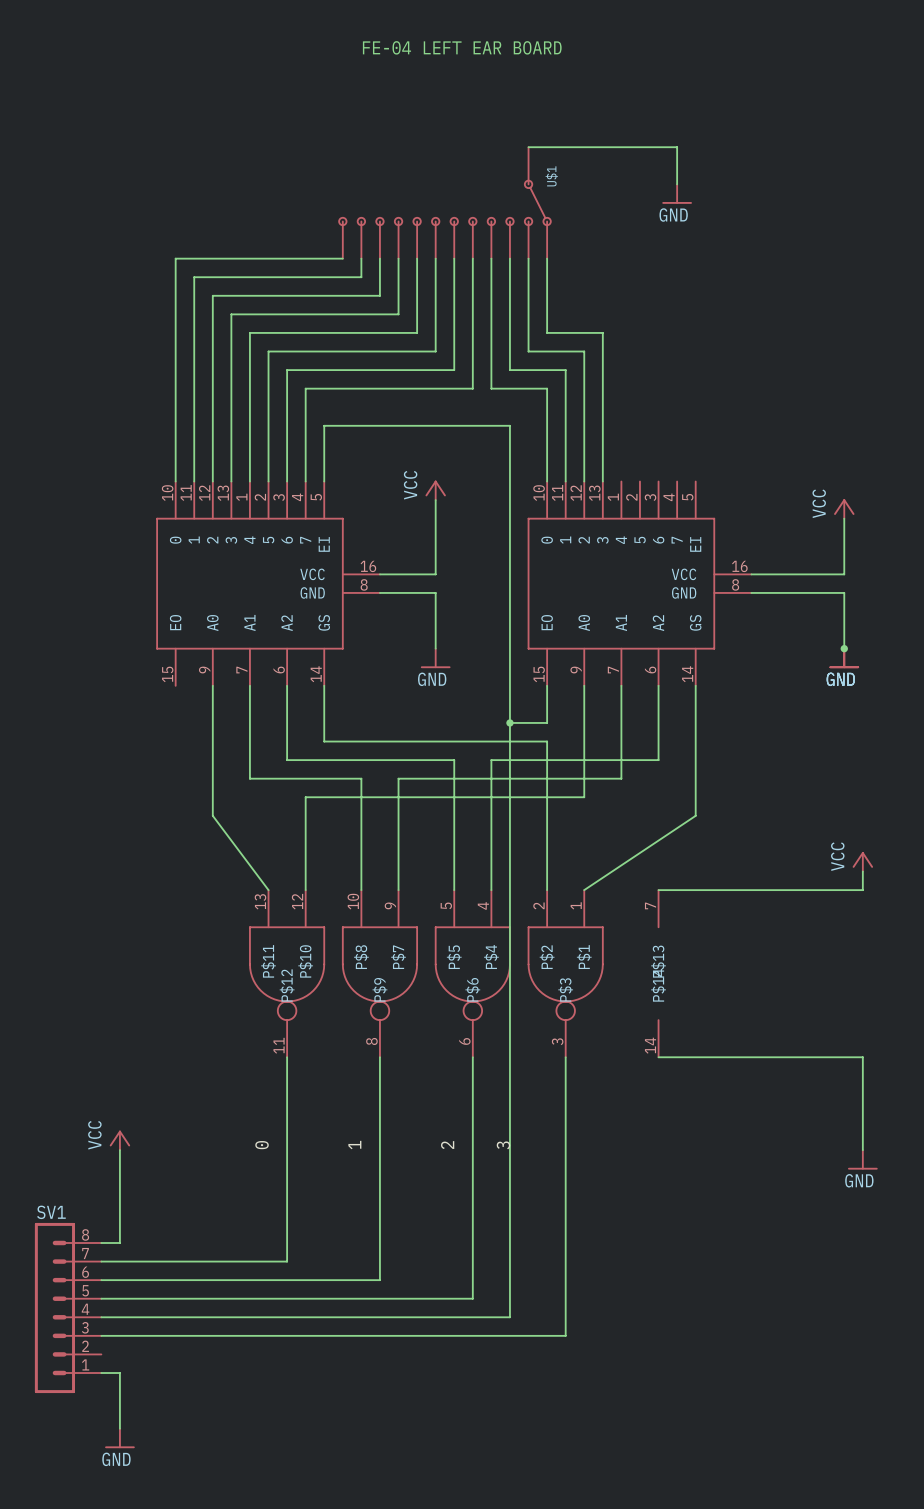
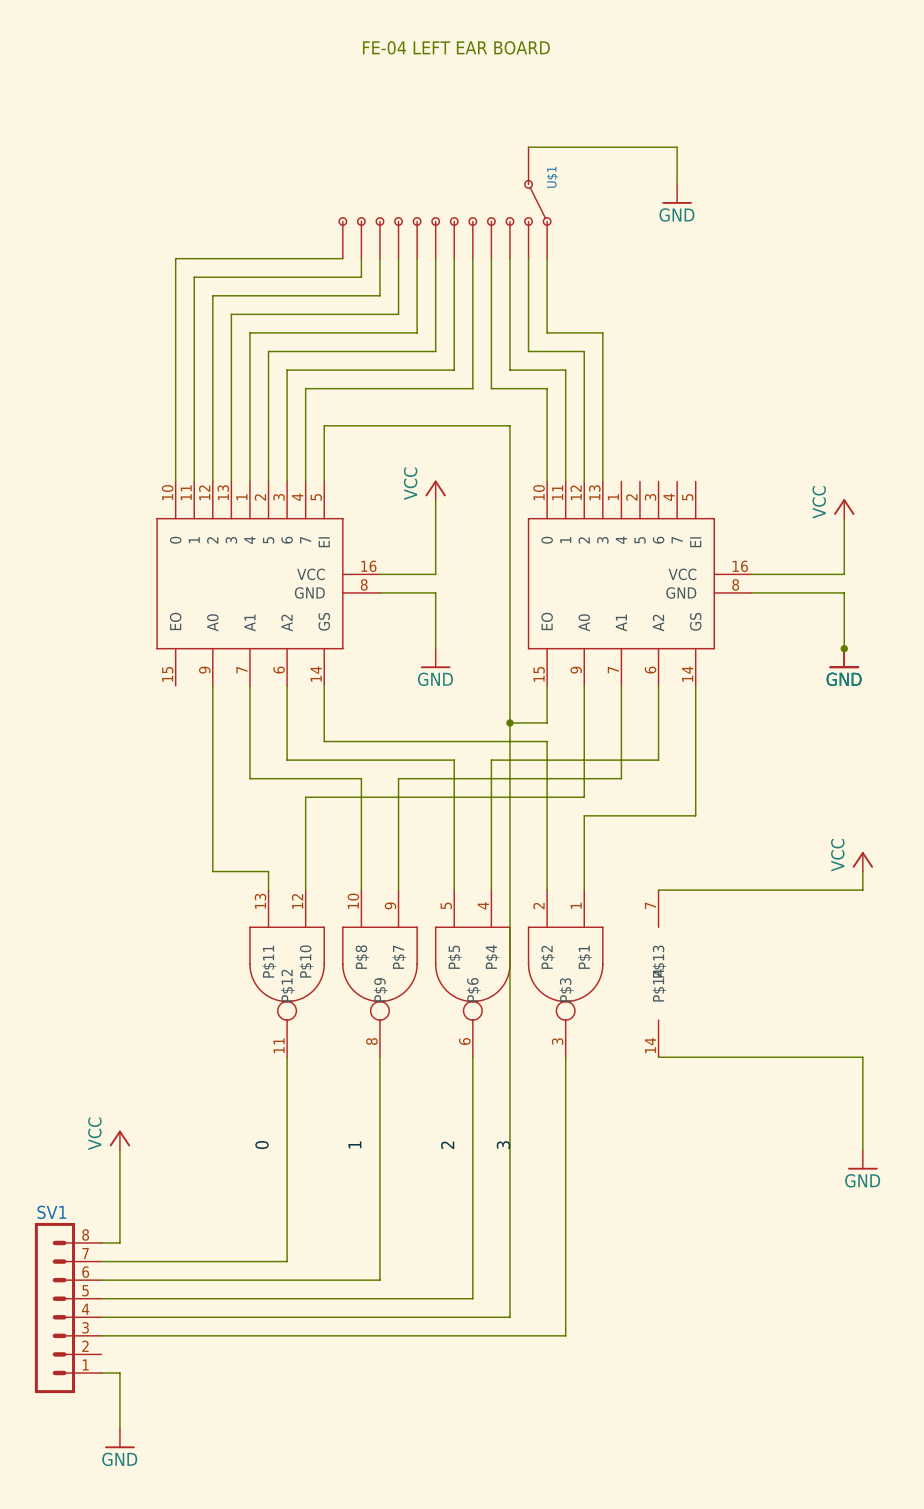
wire: (212, 815) (268, 890) -> (212, 815) (212, 871) (268, 871) (268, 890)
wire: (695, 815) (584, 890) -> (695, 815) (584, 815) (584, 890)

